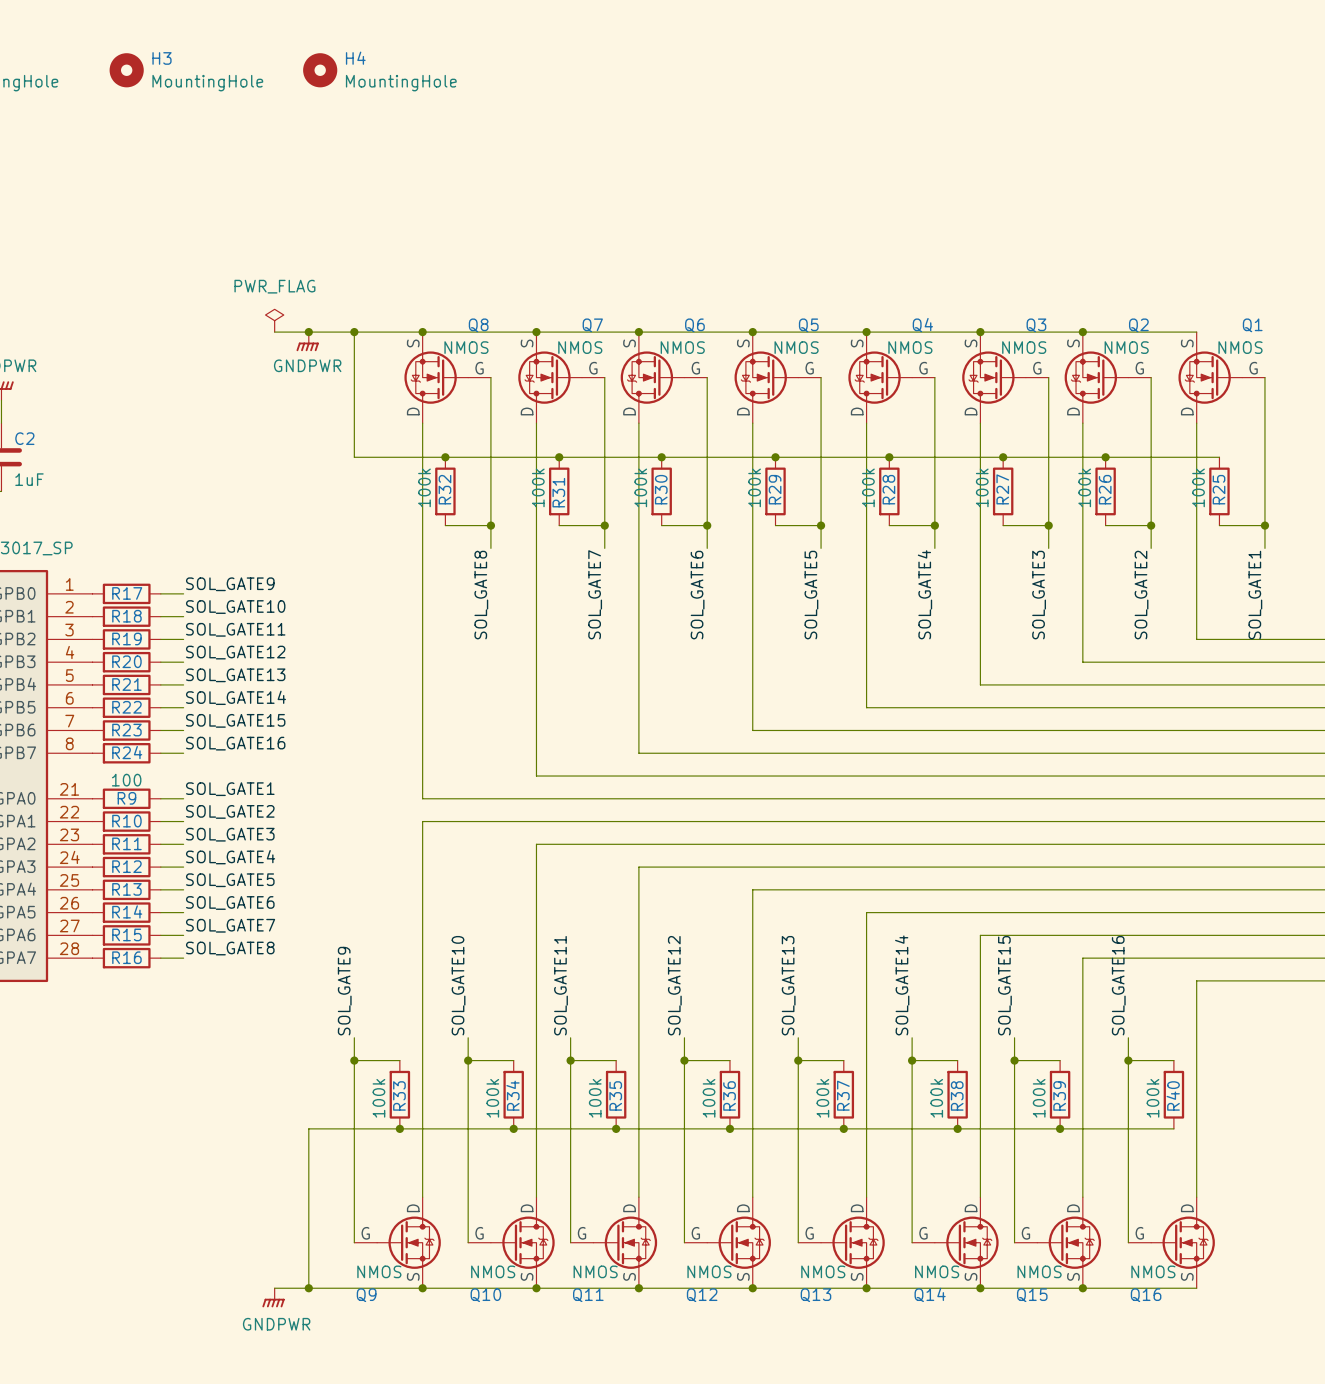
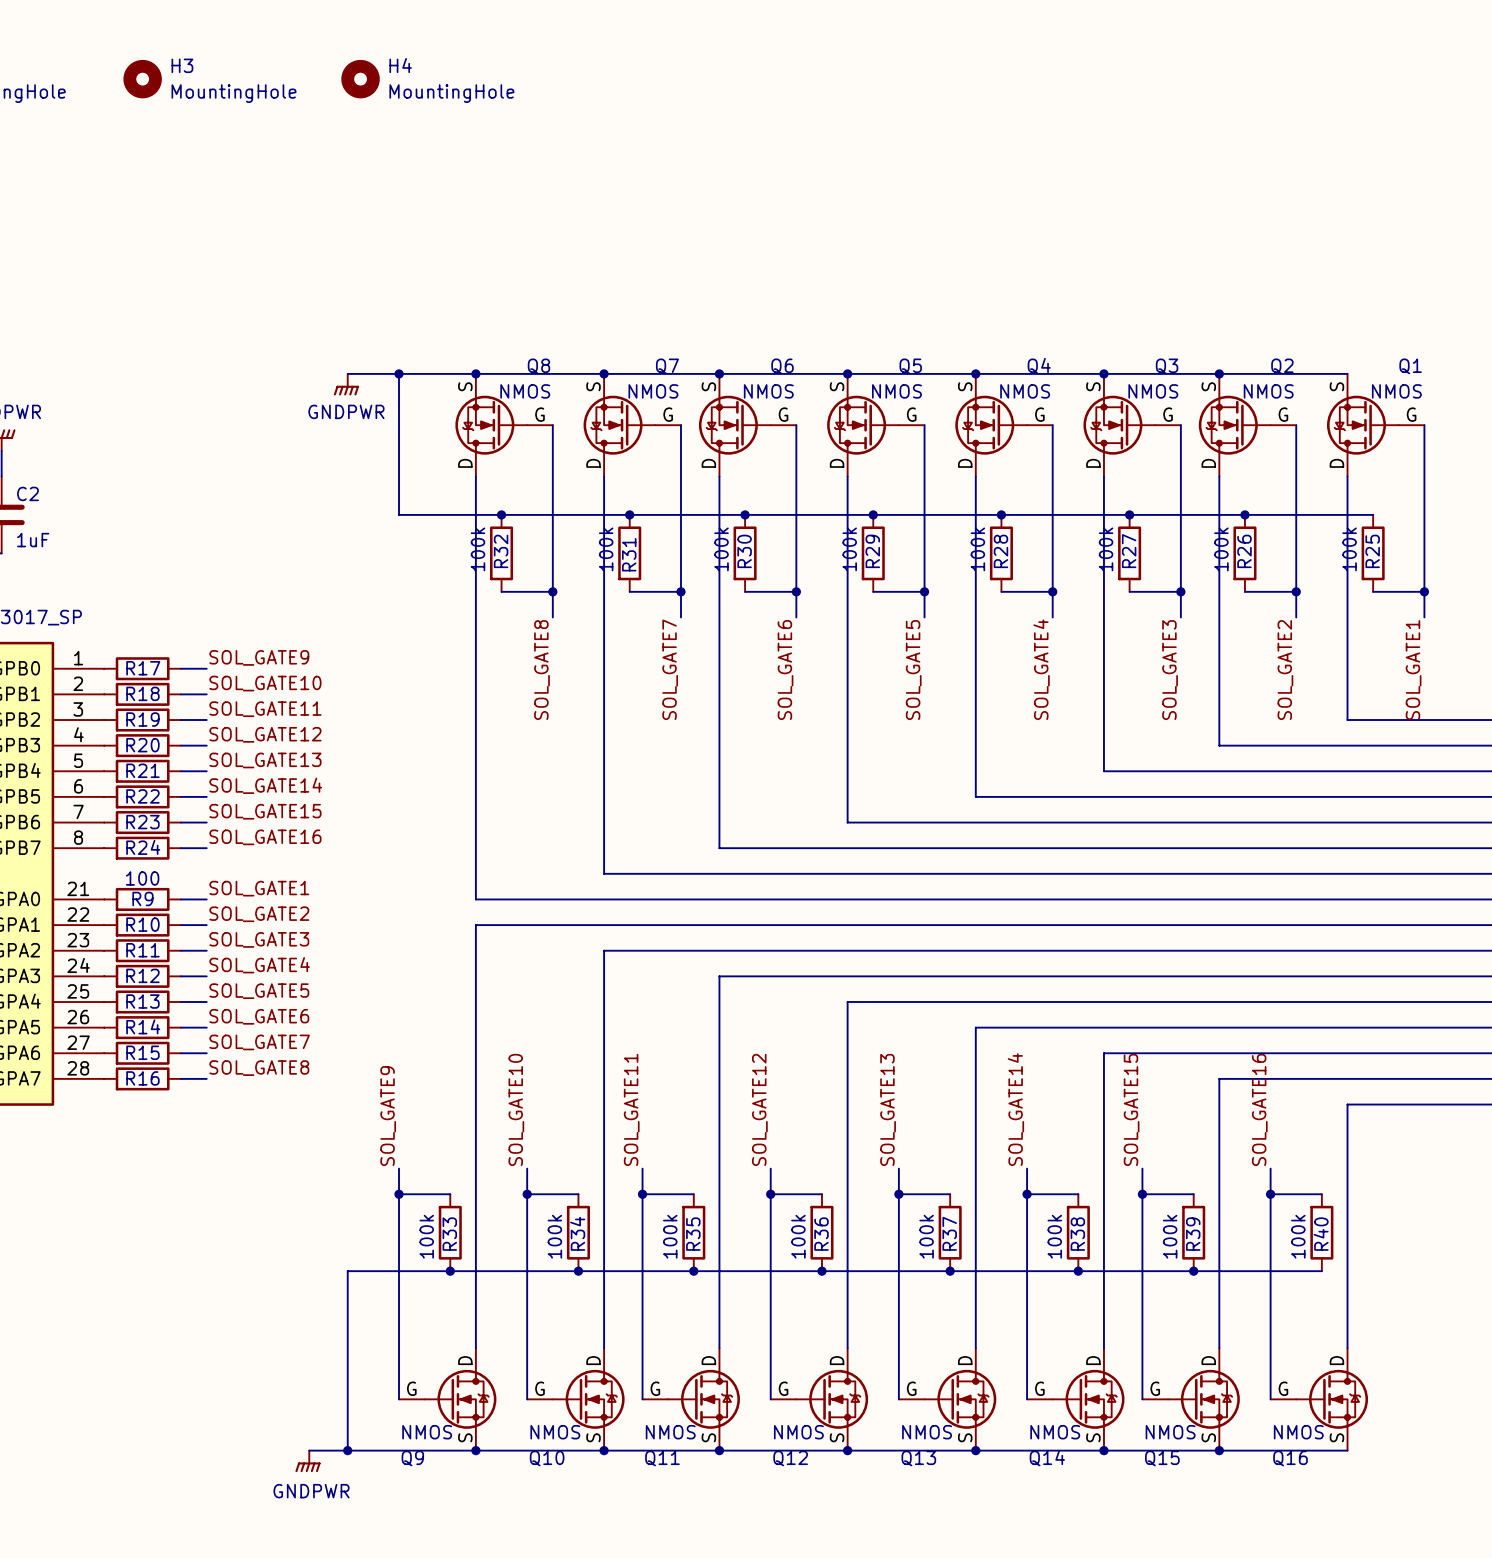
power symbol: PWR_FLAG (274, 320) -> none
wire: (274, 332) (308, 332) -> none
junction: (308, 332) -> none

